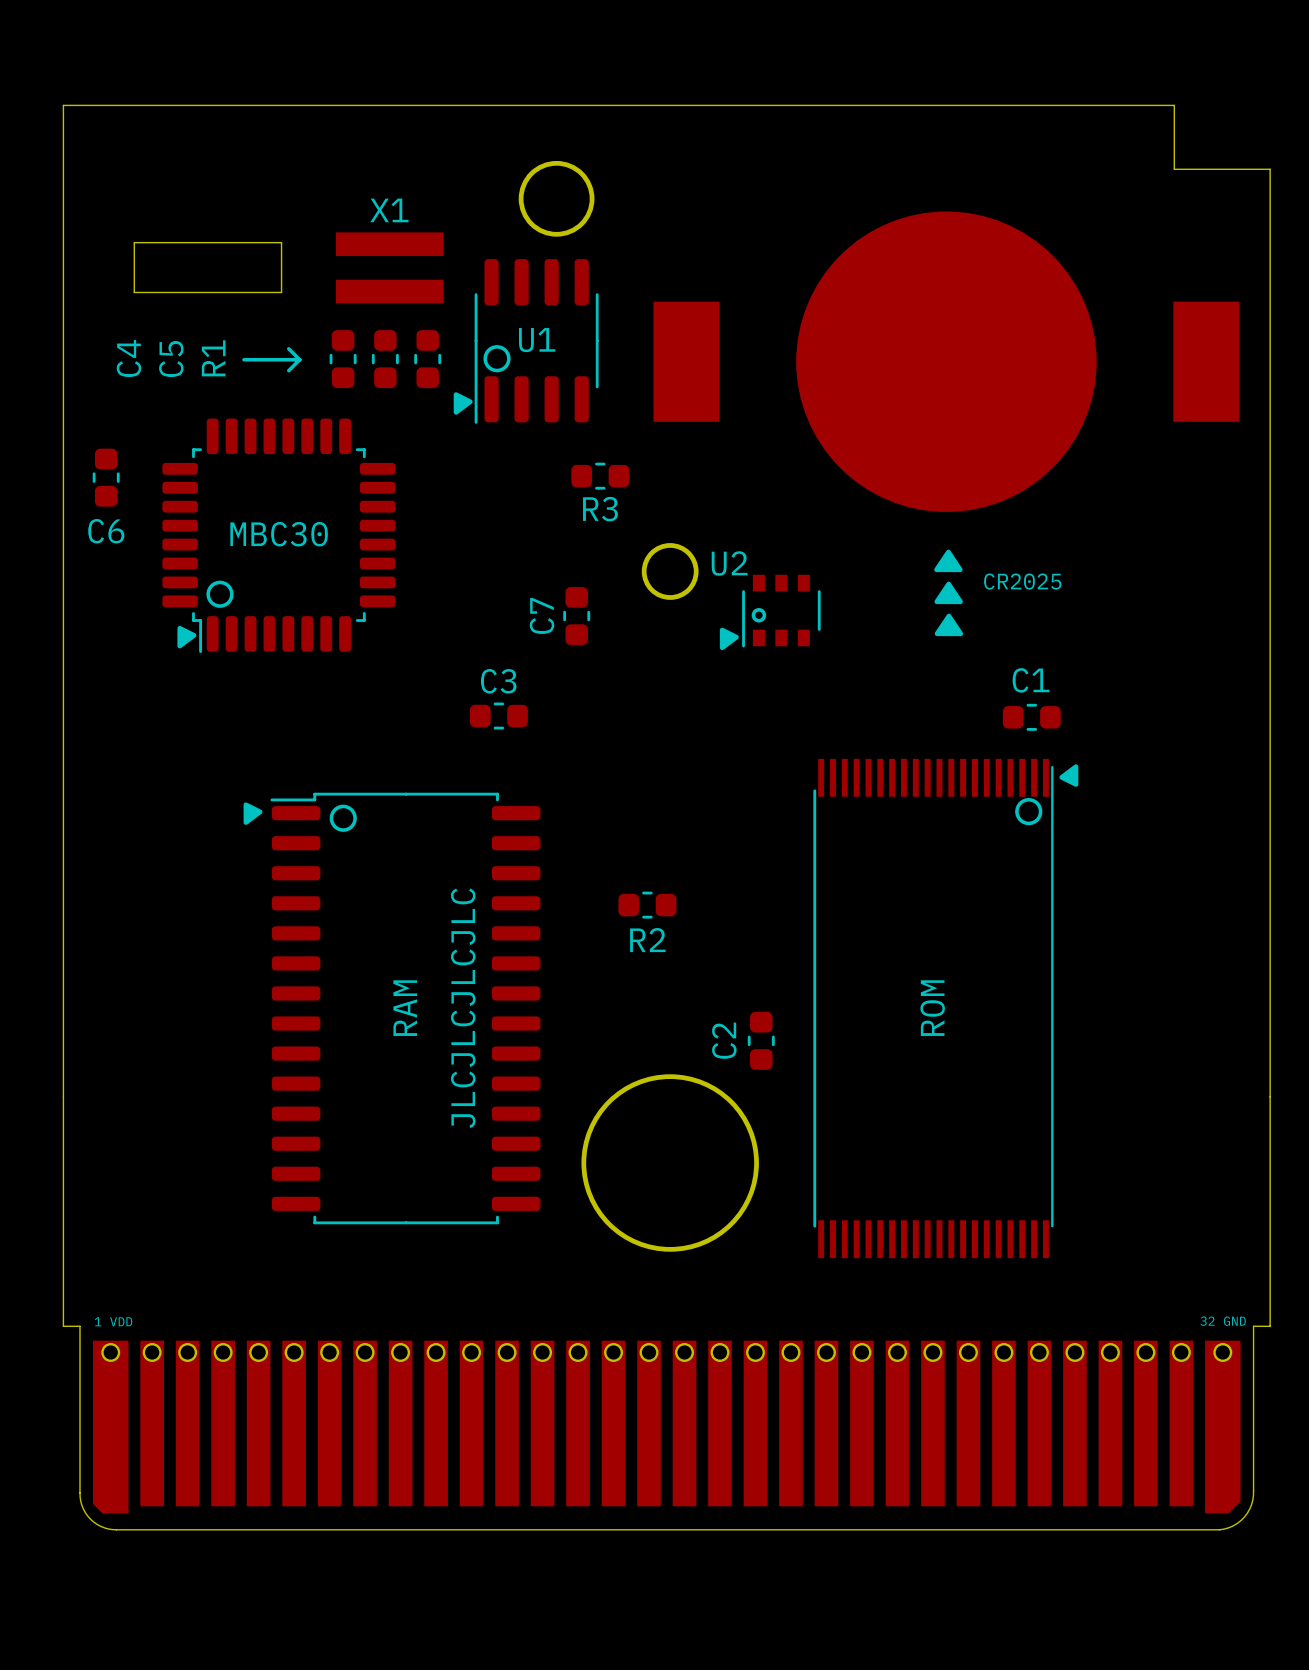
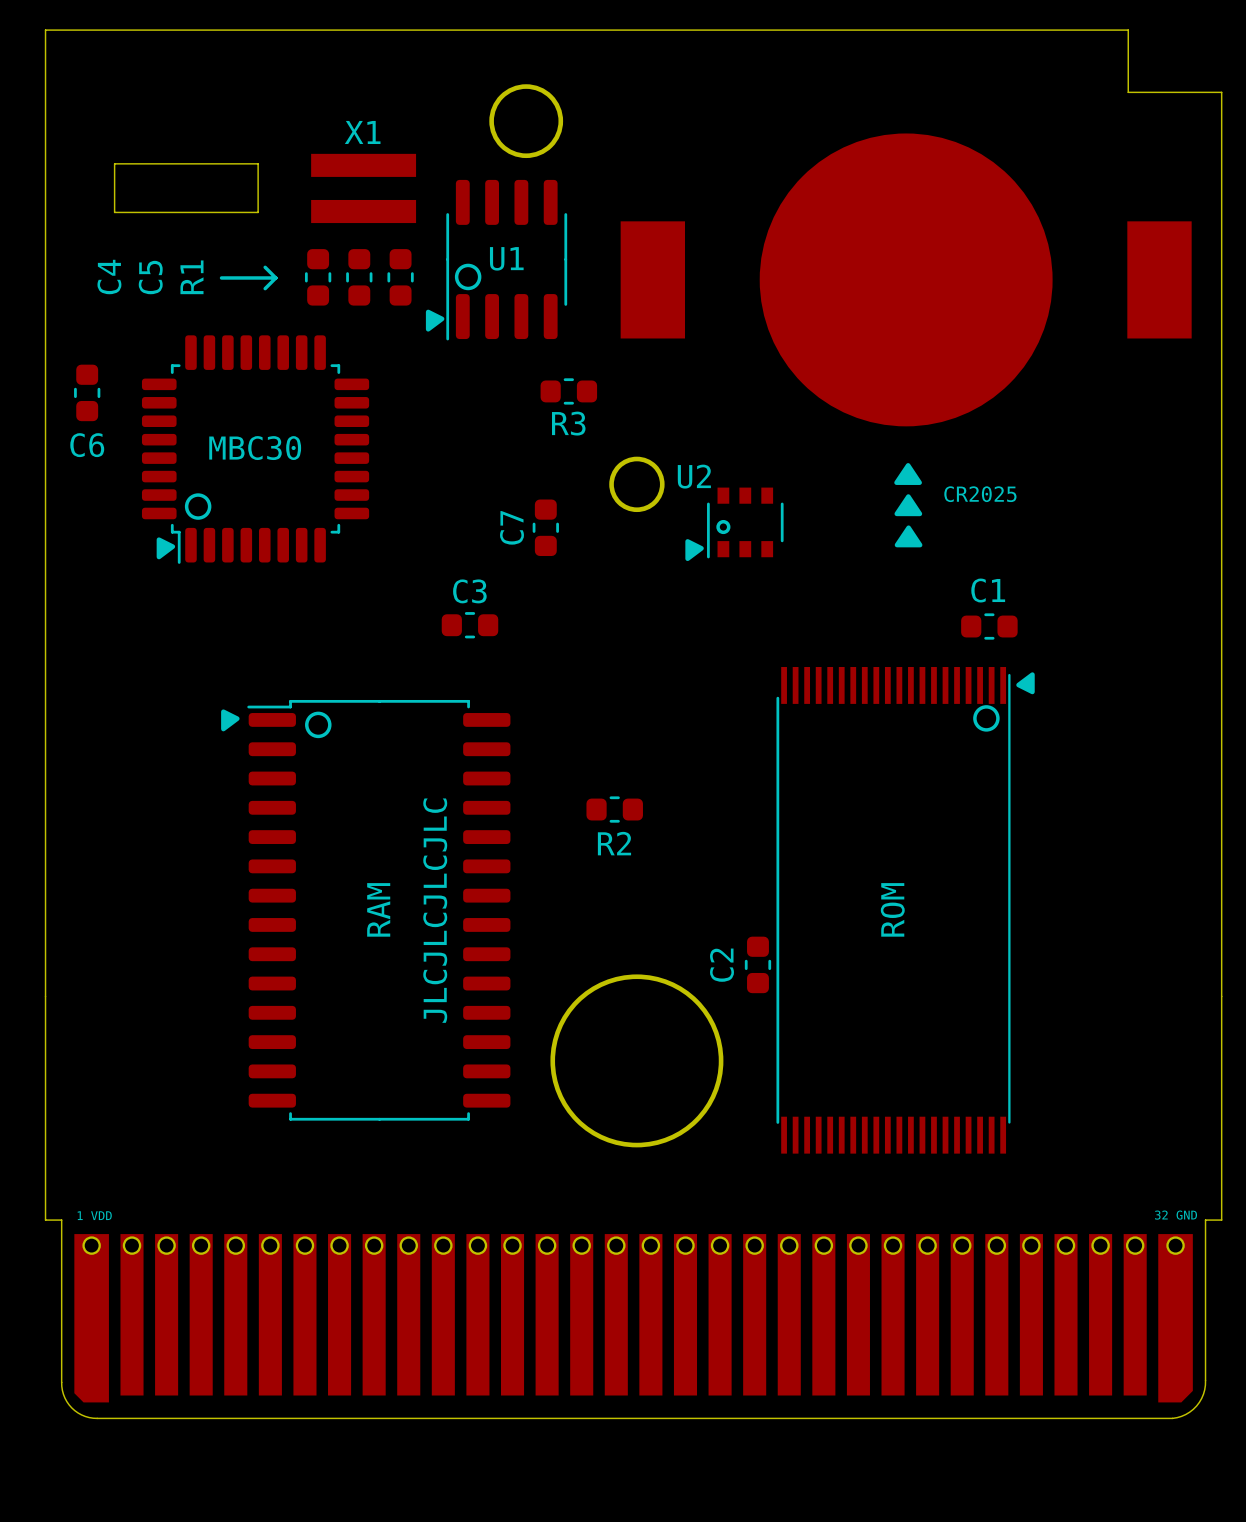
C2 position: (761, 1040) -> (757, 964)

